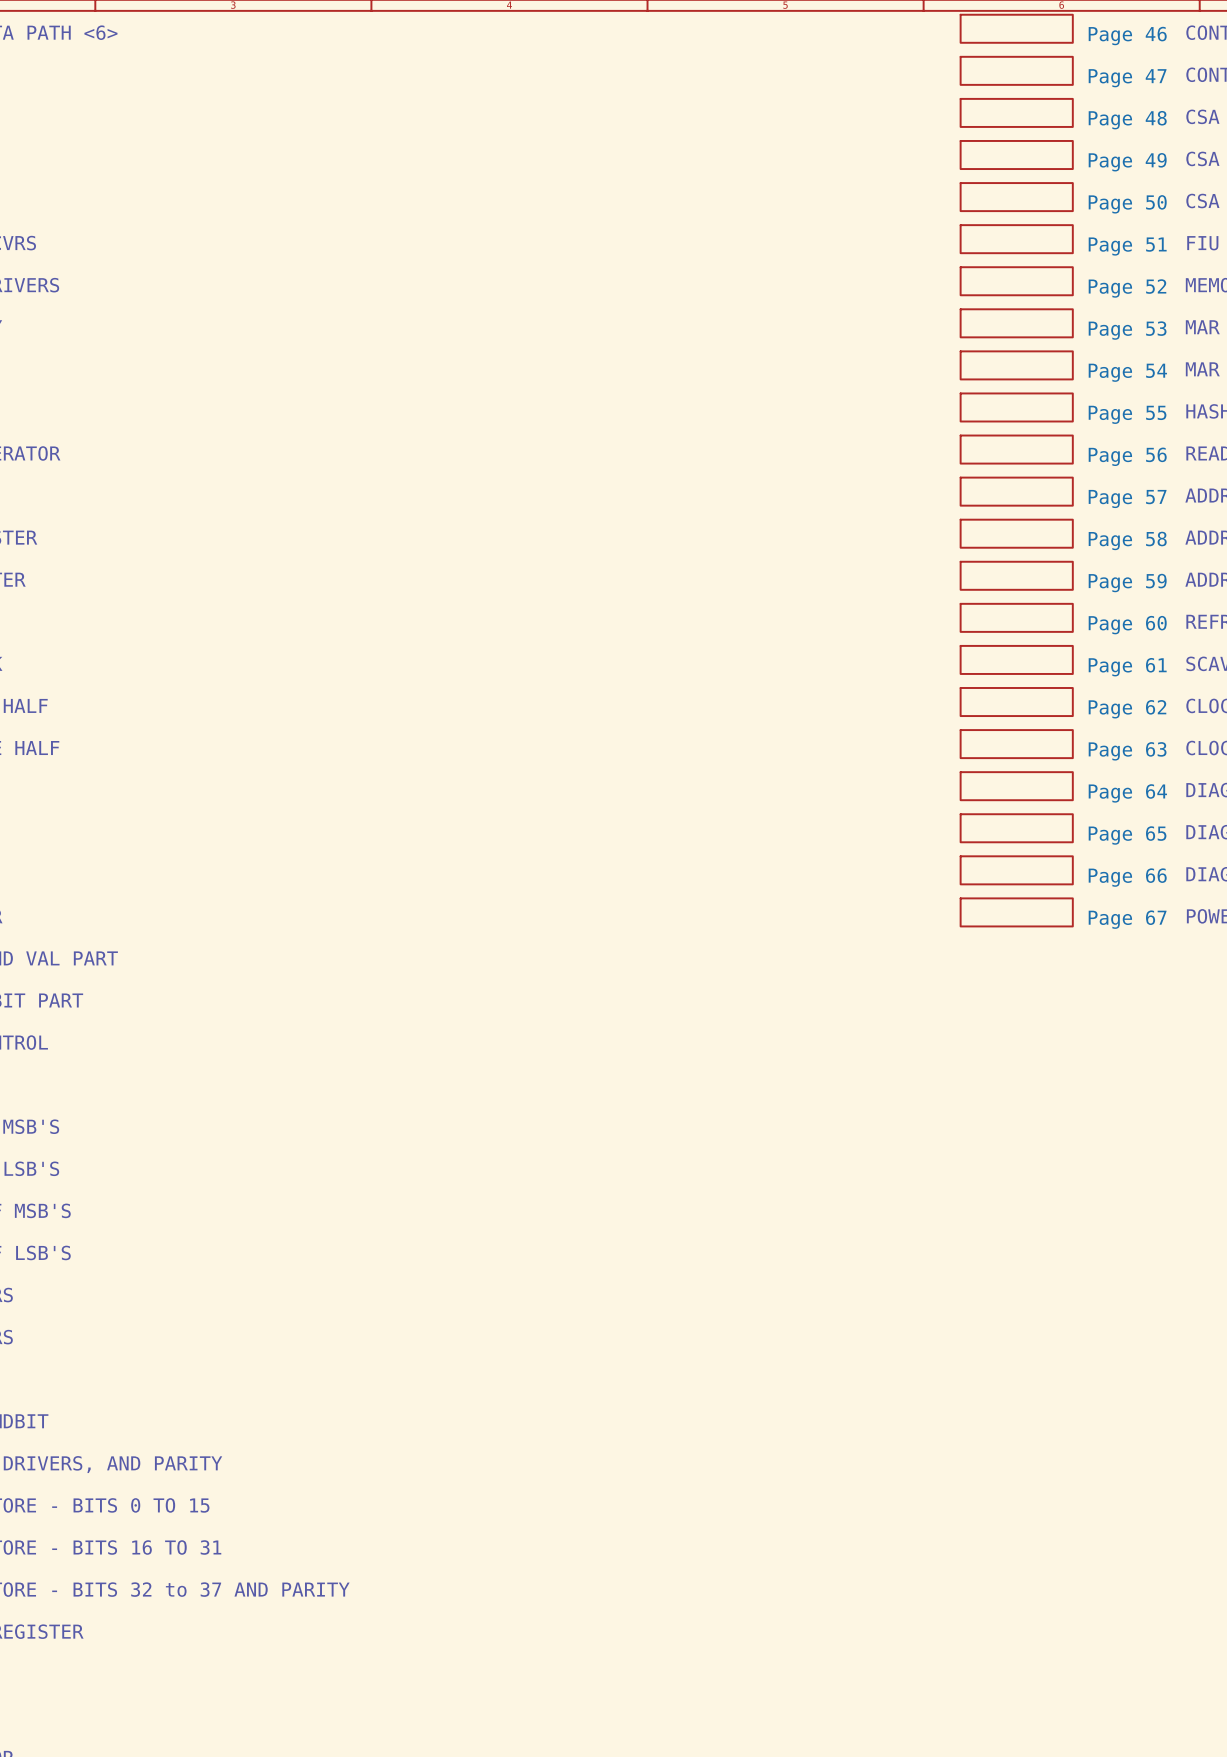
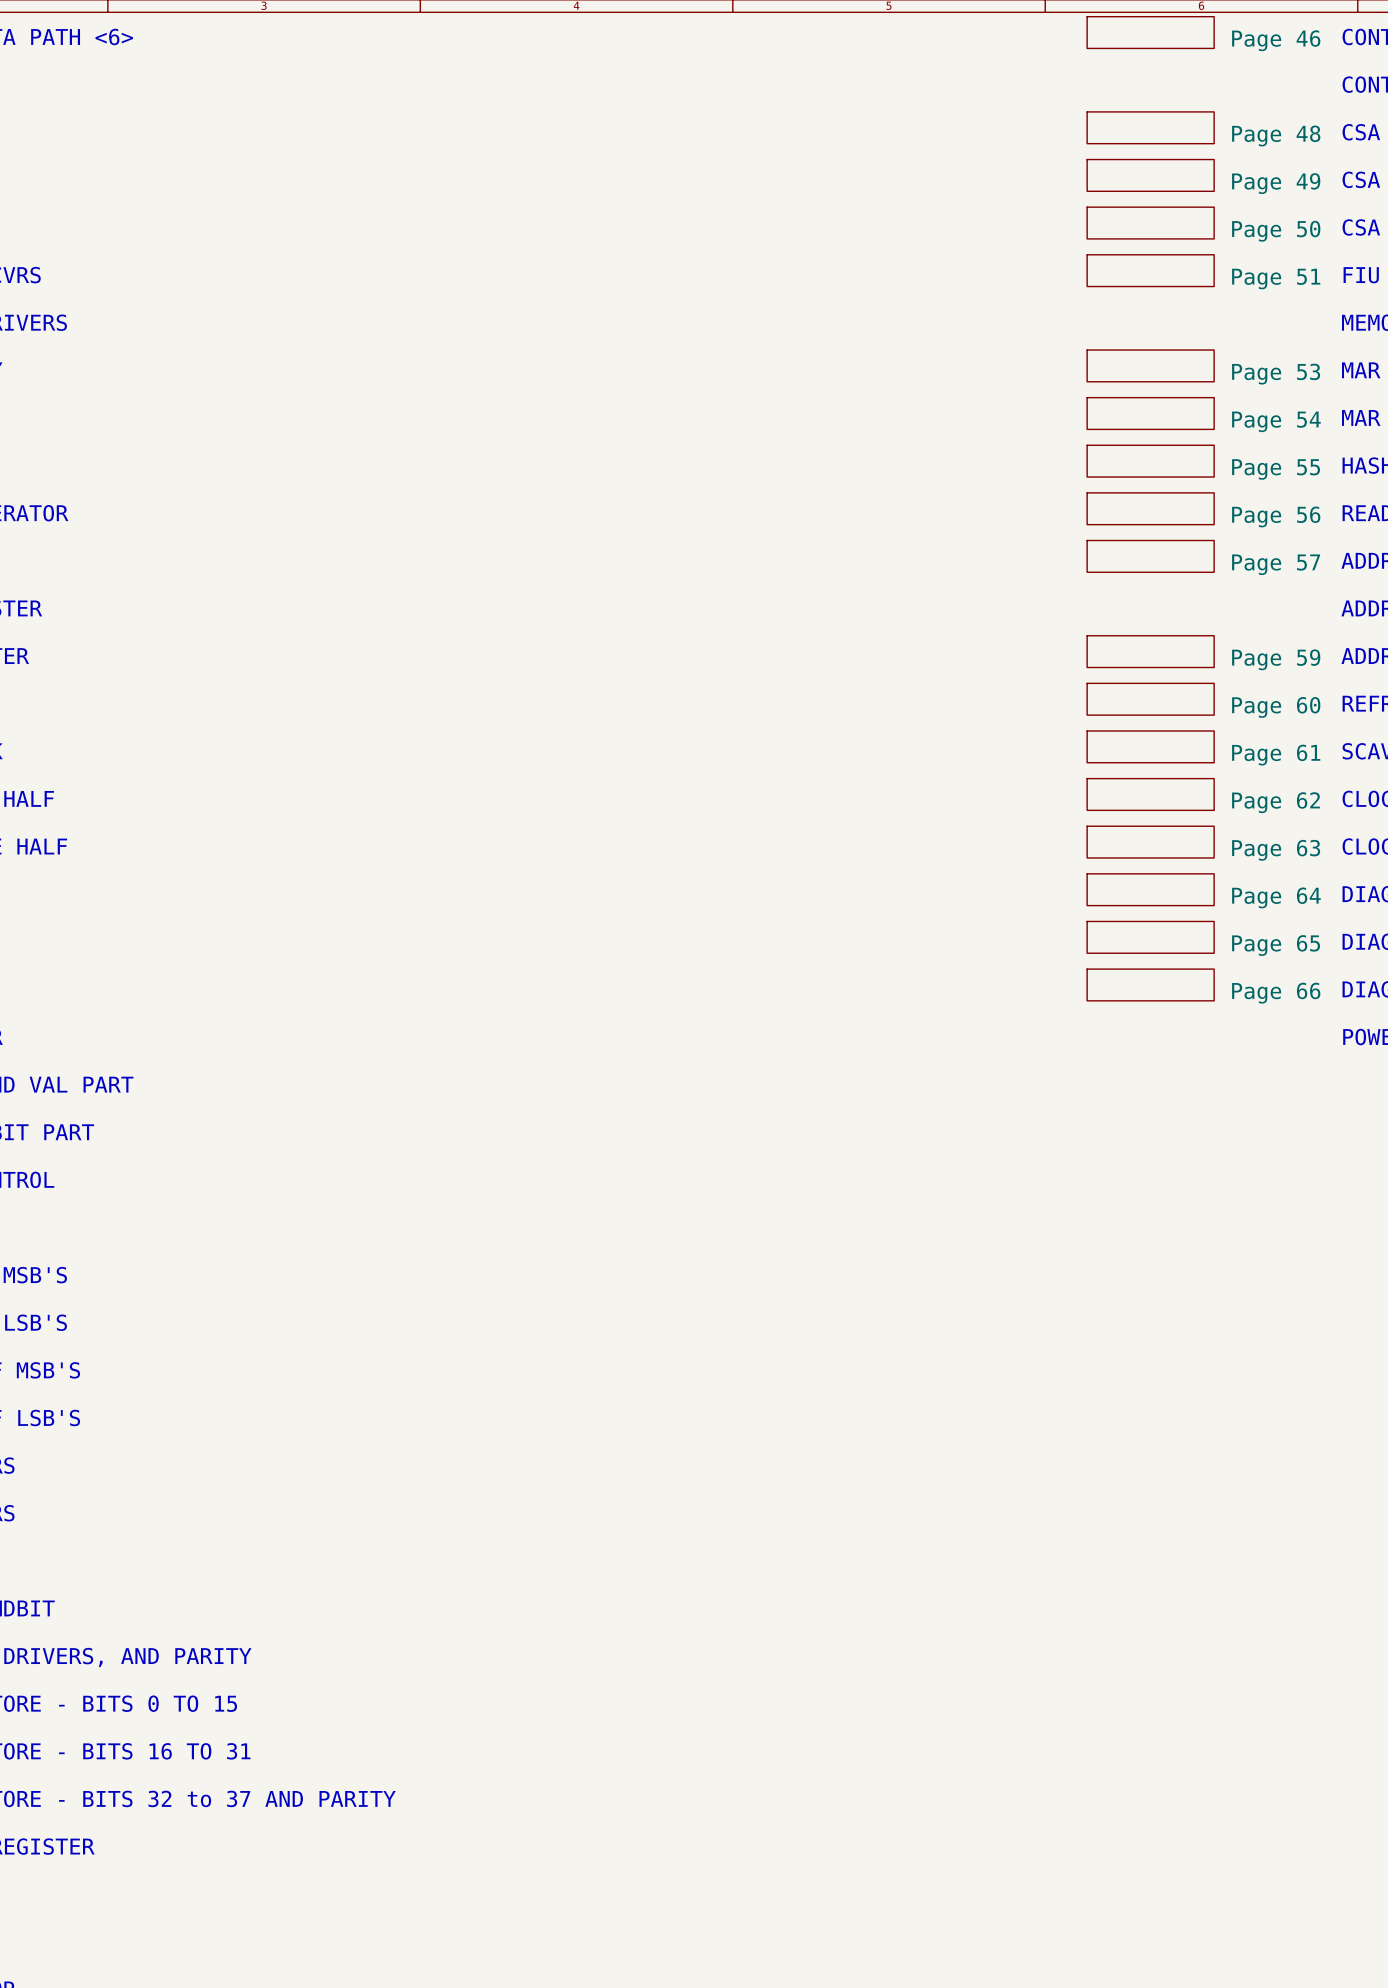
sheet Page 47: (1016, 70) -> none
sheet Page 52: (1016, 281) -> none
sheet Page 58: (1016, 533) -> none
sheet Page 67: (1016, 912) -> none

